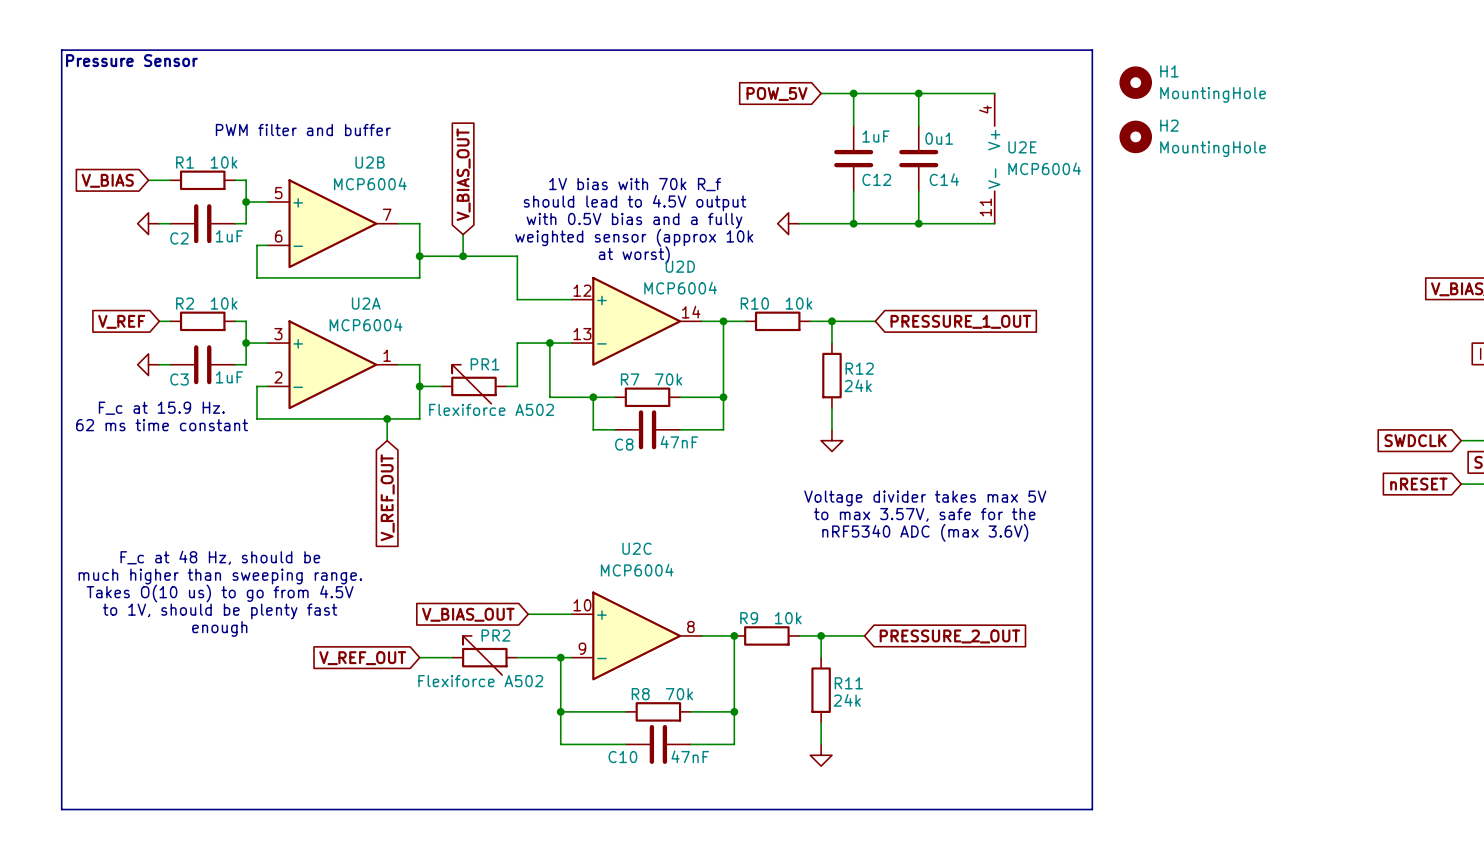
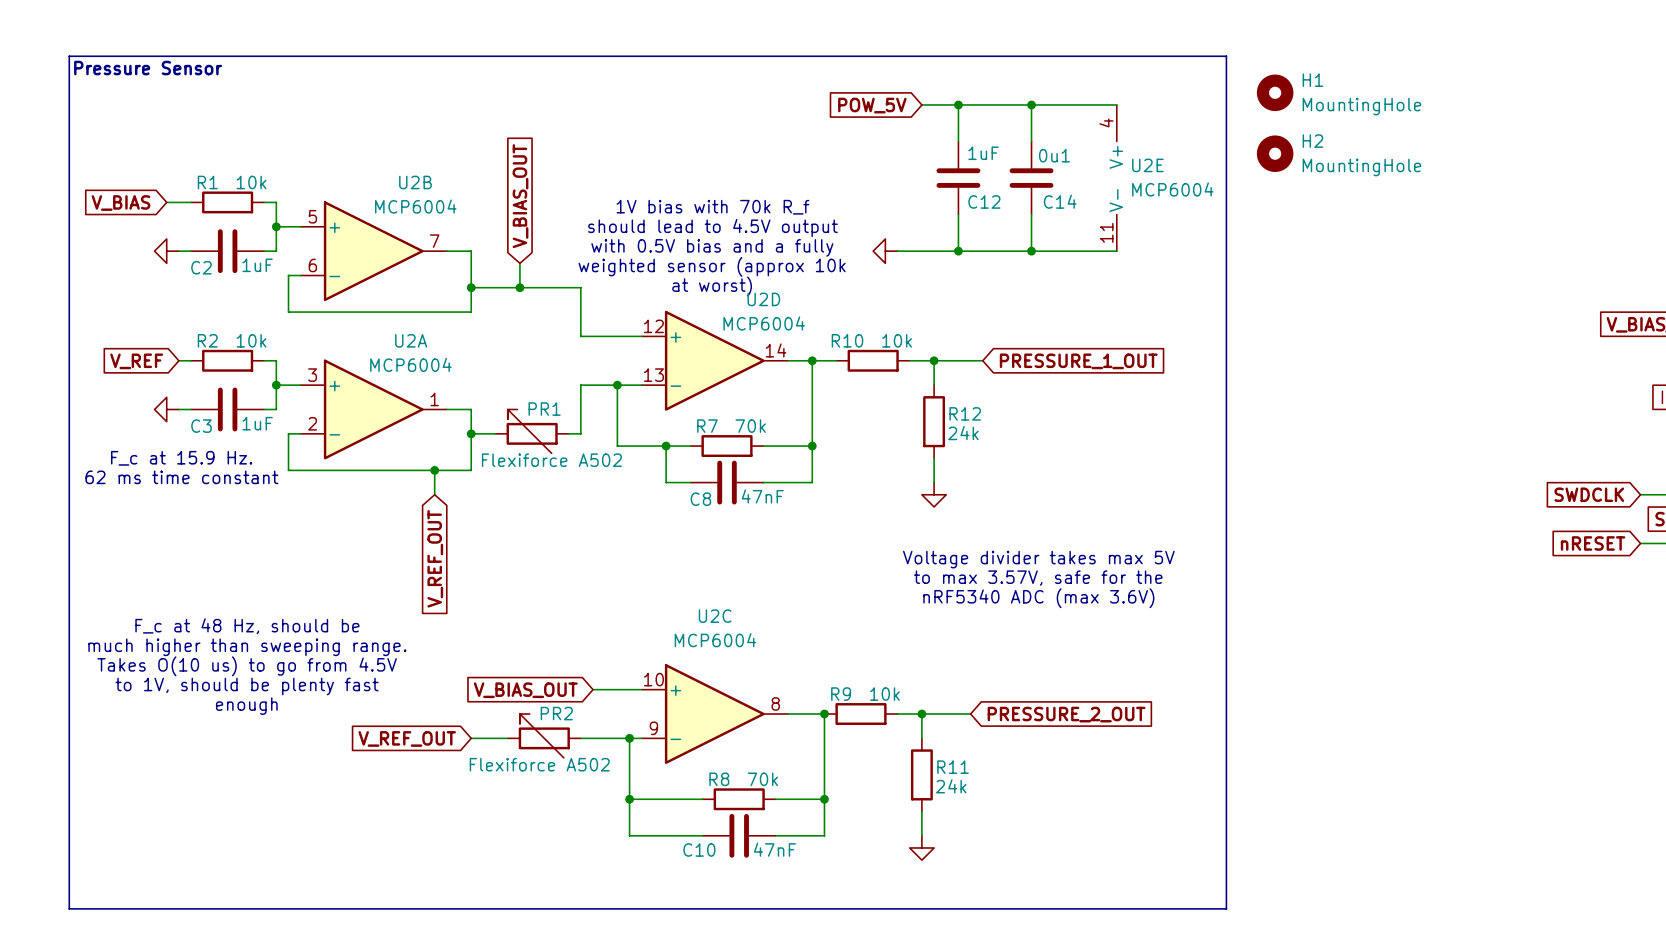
text: PWM filter and buffer (303, 130) -> none

